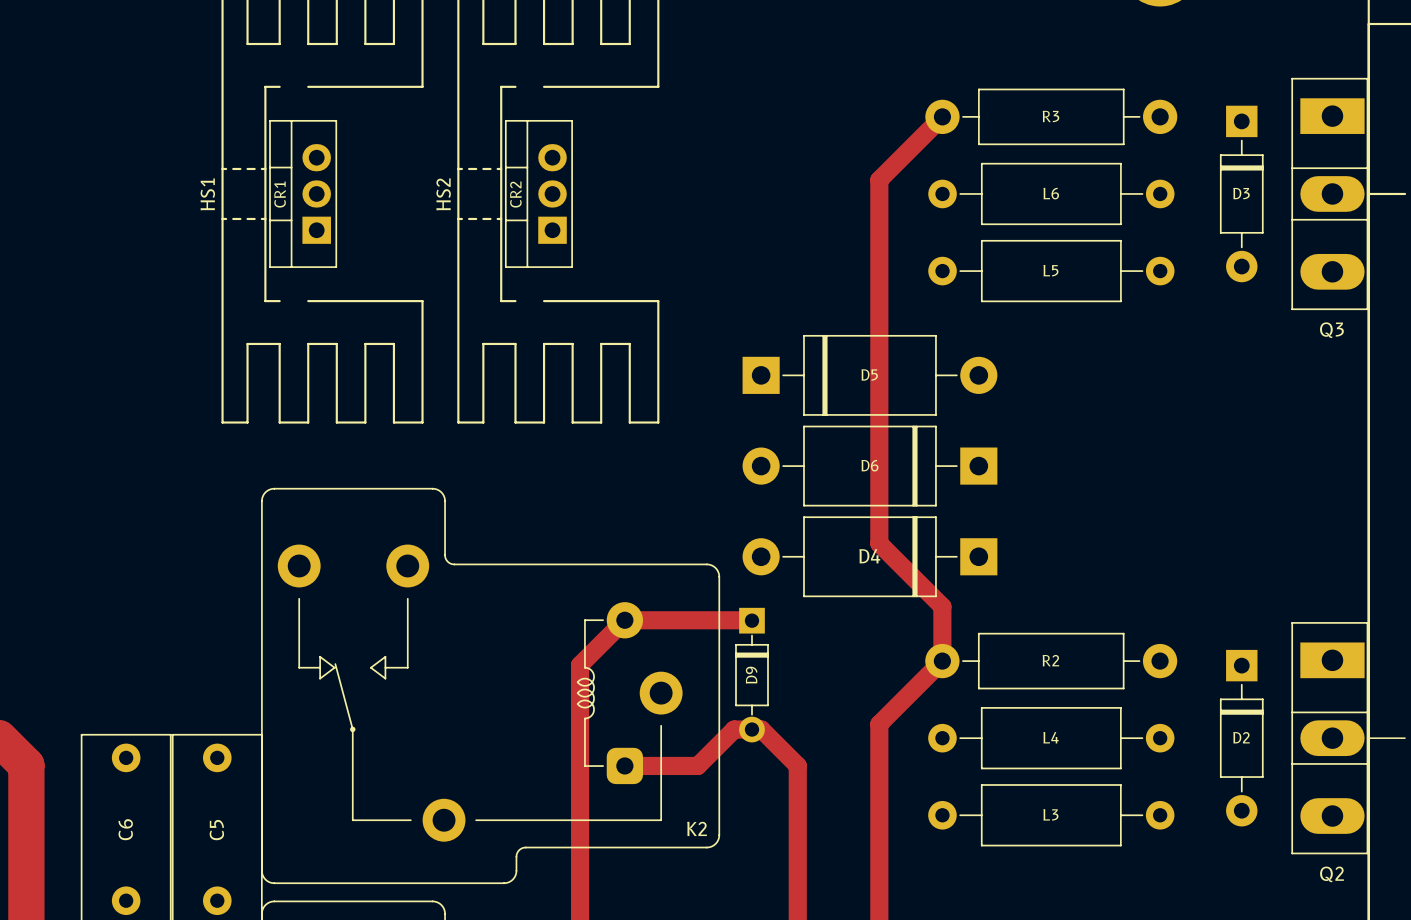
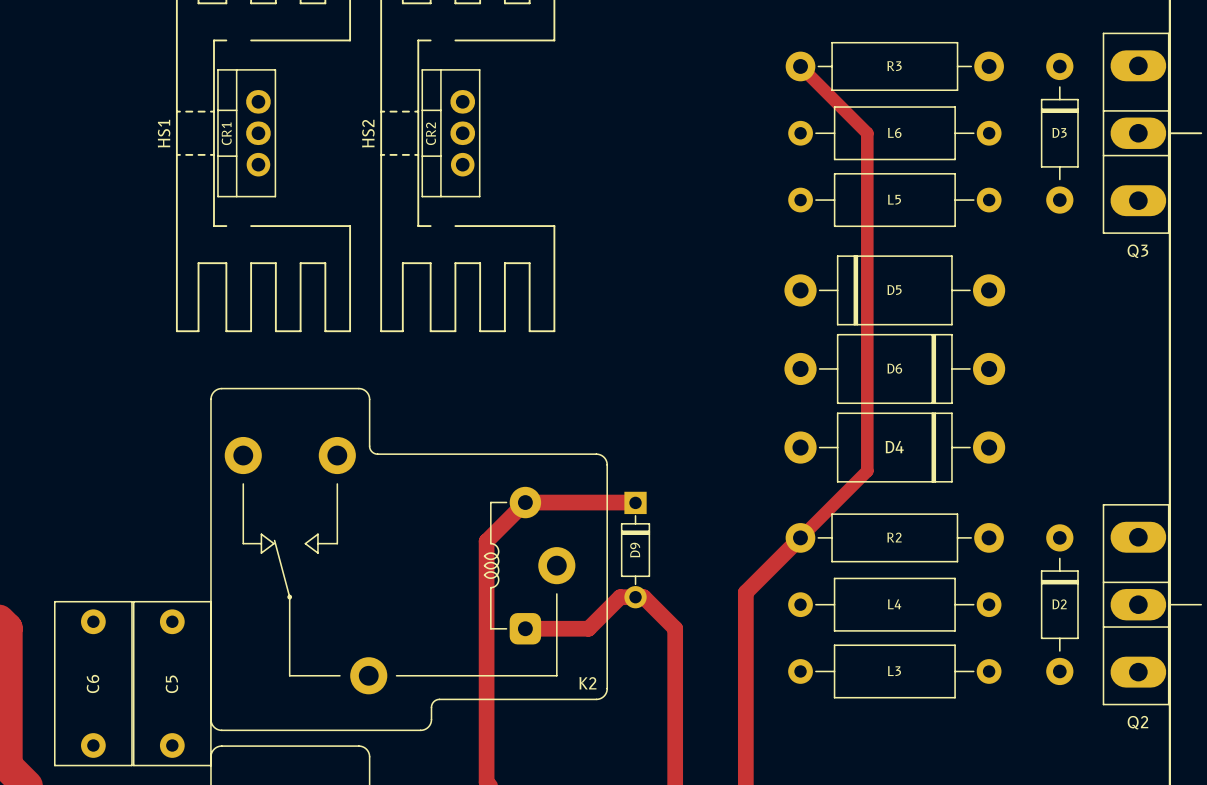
Q3 footprint: [1291, 77, 1369, 311] -> [1102, 32, 1170, 234]
D3 footprint: [1219, 105, 1264, 283] -> [1040, 52, 1079, 214]
track: (942, 116) (879, 180) (879, 543) (942, 606) (942, 661) -> (800, 66) (867, 133) (867, 471) (800, 537)
CR1 footprint: [269, 119, 338, 268] -> [217, 69, 277, 198]
CR2 footprint: [504, 119, 573, 268] -> [421, 69, 481, 198]
D5 footprint: [742, 334, 998, 416] -> [784, 255, 1006, 326]
D6 footprint: [742, 425, 998, 507] -> [784, 333, 1006, 404]
D4 footprint: [742, 516, 998, 598] -> [784, 412, 1006, 483]
Q2 footprint: [1291, 622, 1369, 855] -> [1102, 504, 1170, 706]
D2 footprint: [1219, 649, 1264, 827] -> [1040, 524, 1079, 686]

